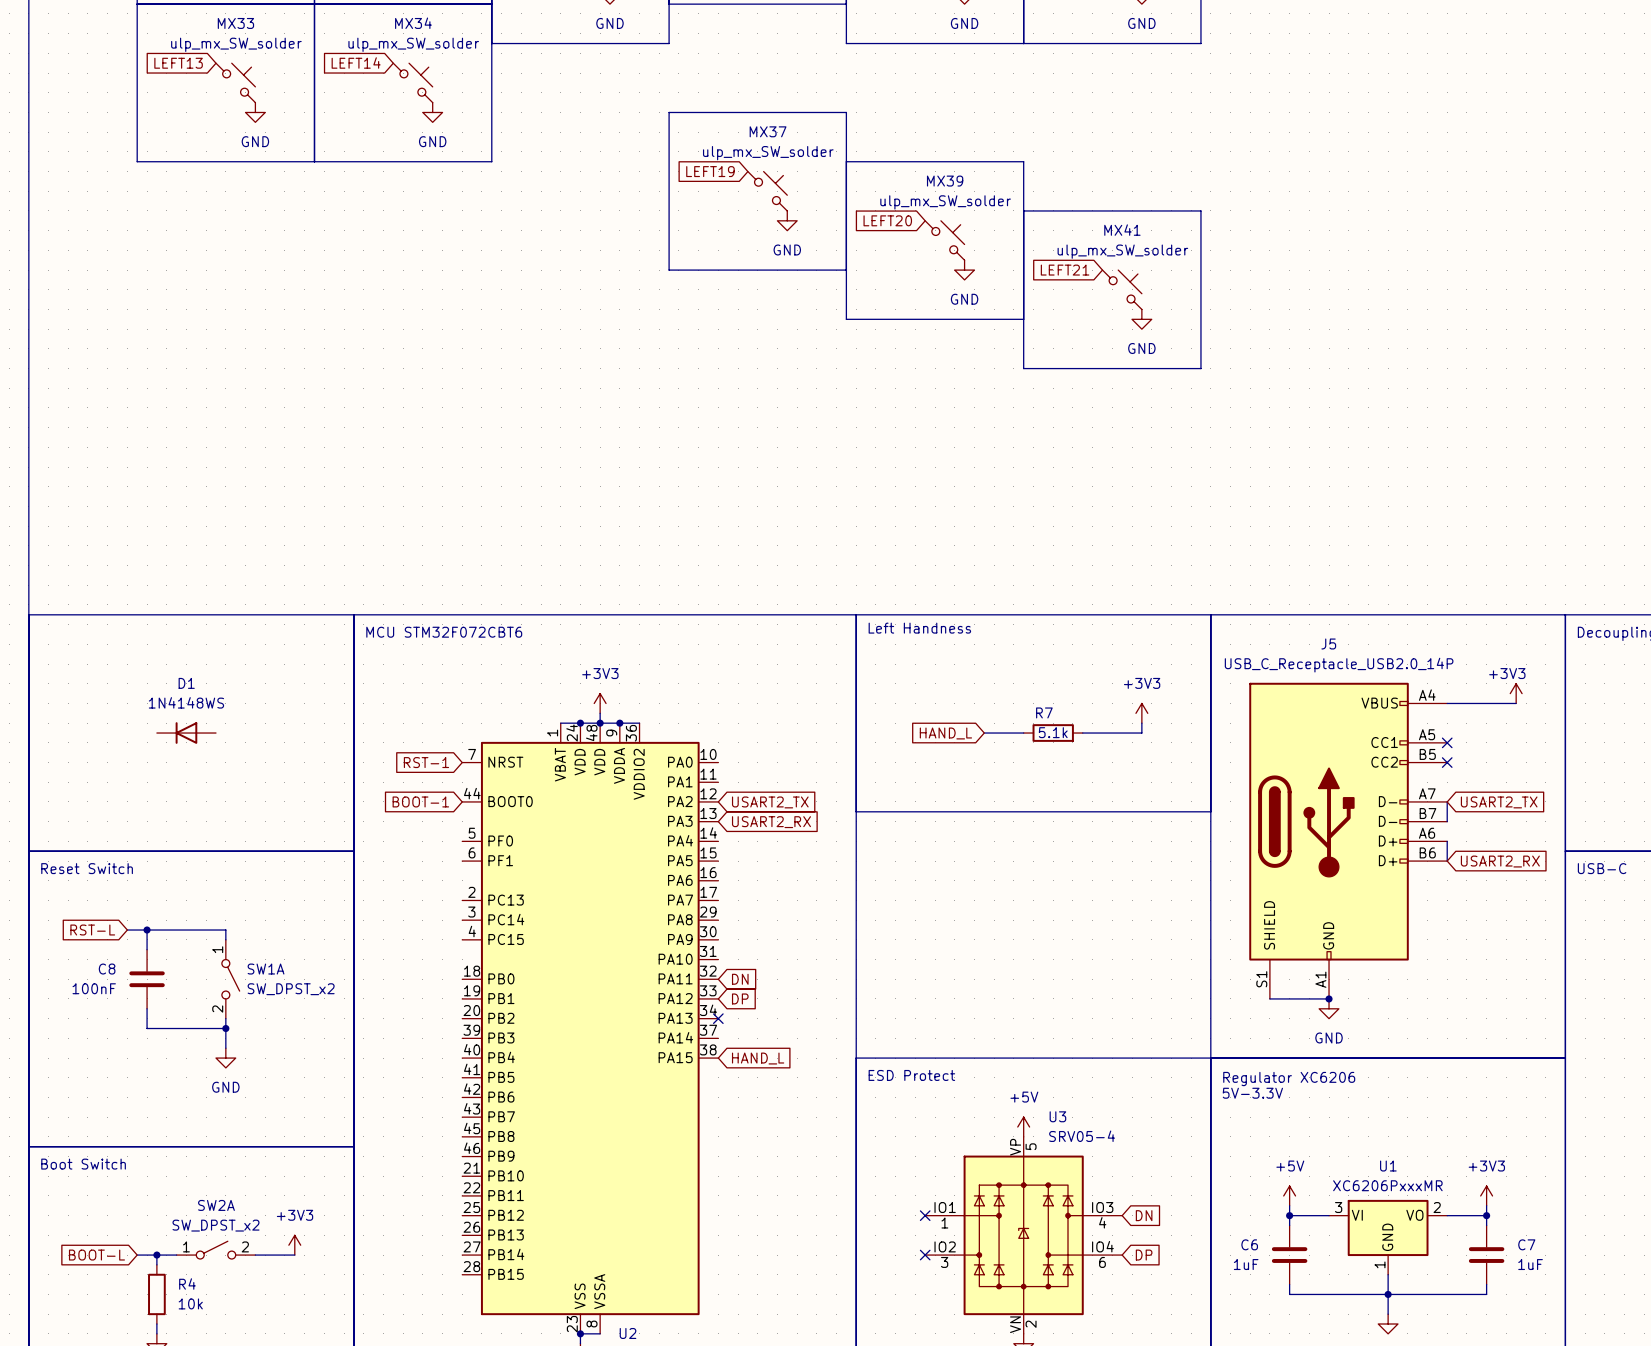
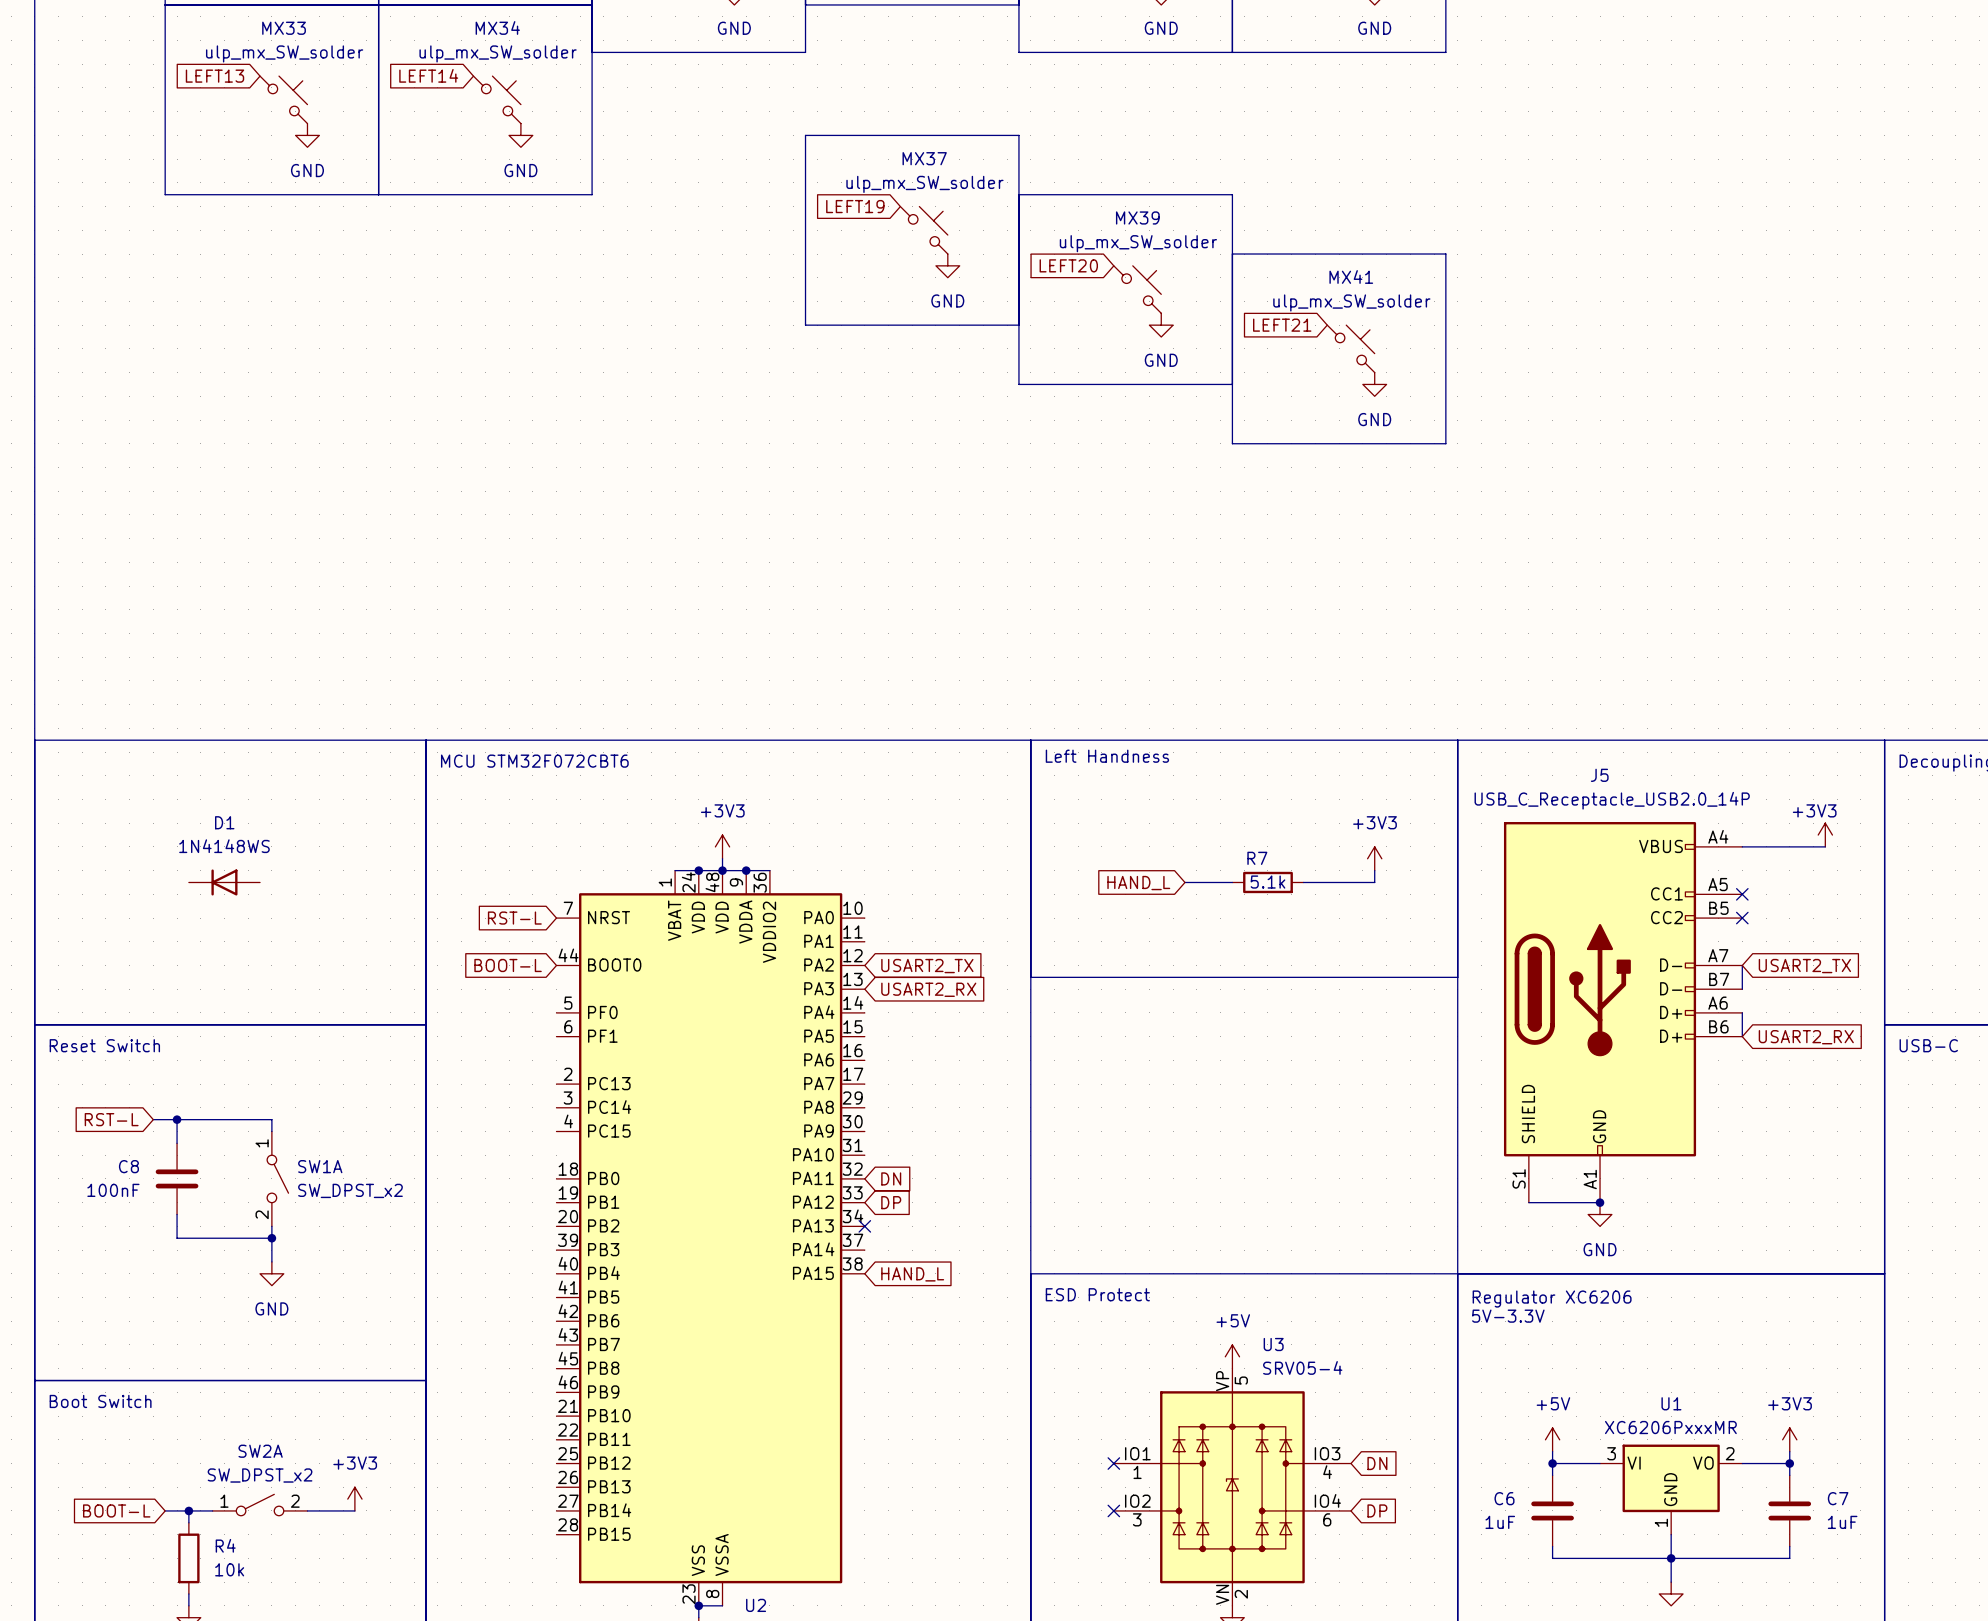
global label: RST-1 (426, 762) -> RST-L (514, 918)
global label: BOOT-1 (420, 801) -> BOOT-L (508, 965)

